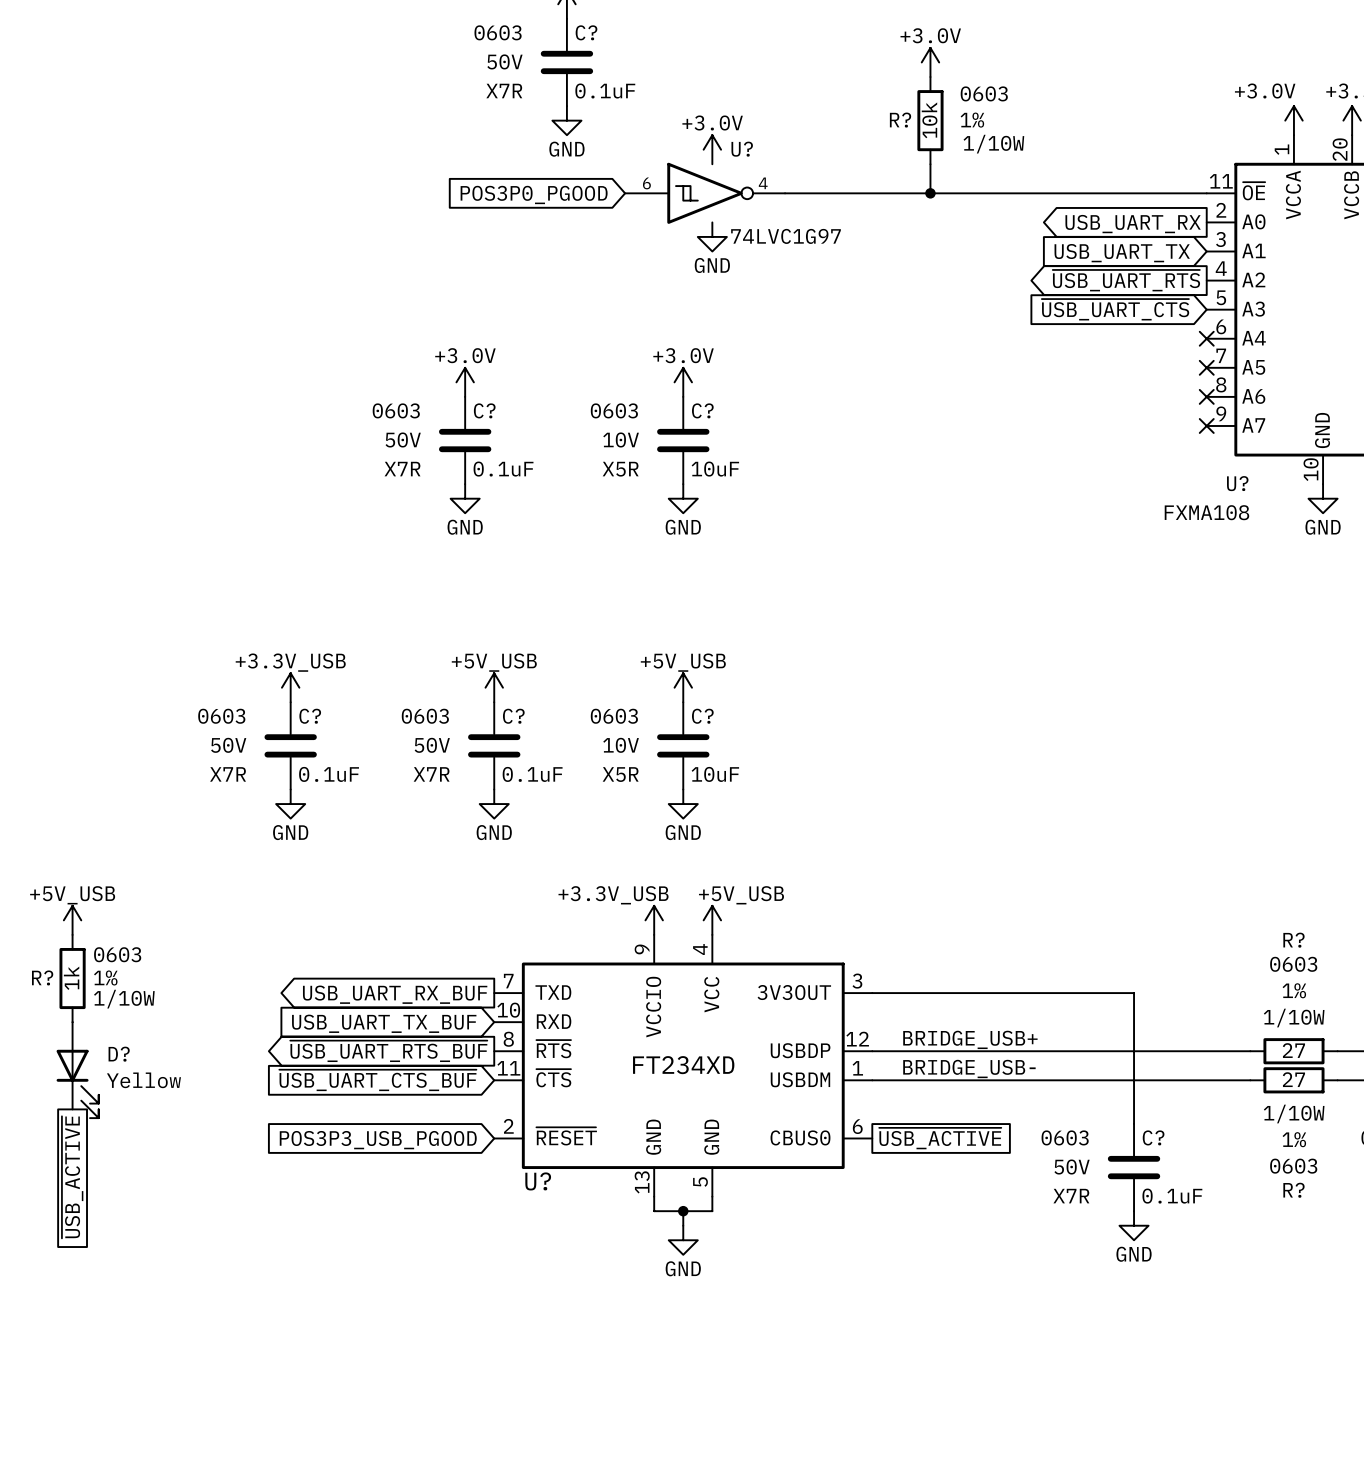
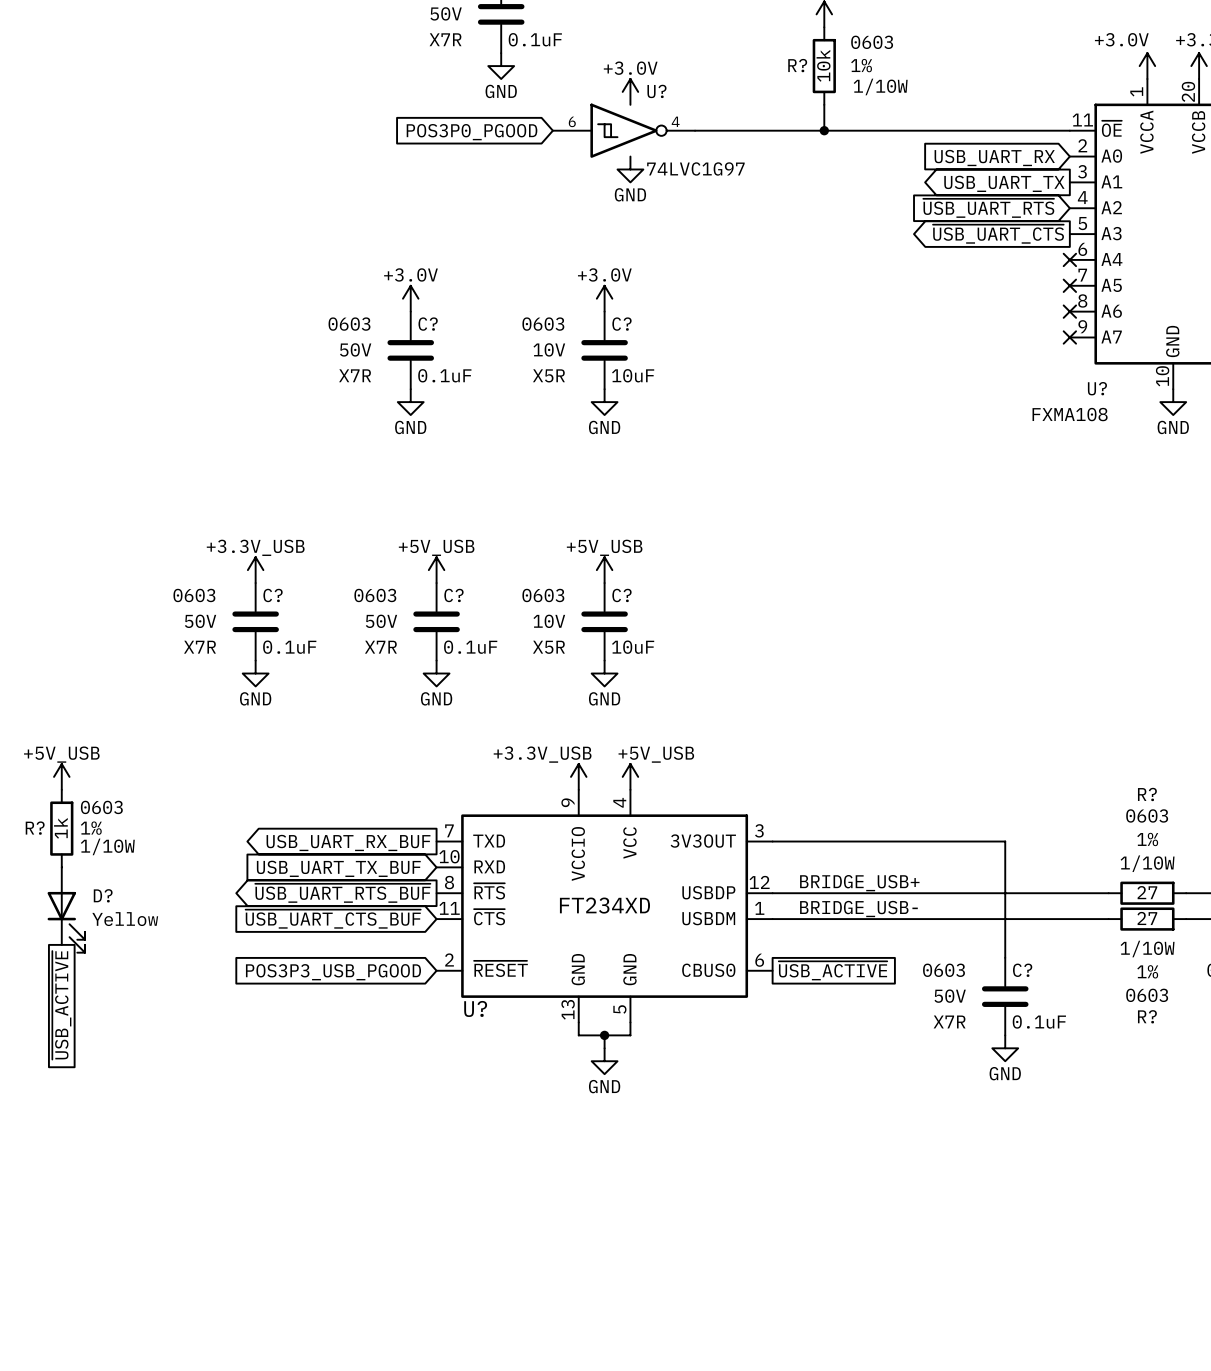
global label shape: output (1133, 224) -> input (994, 158)
global label shape: input (1122, 253) -> output (1004, 183)
global label shape: output (1126, 280) -> input (988, 208)
global label shape: input (1115, 309) -> output (998, 234)

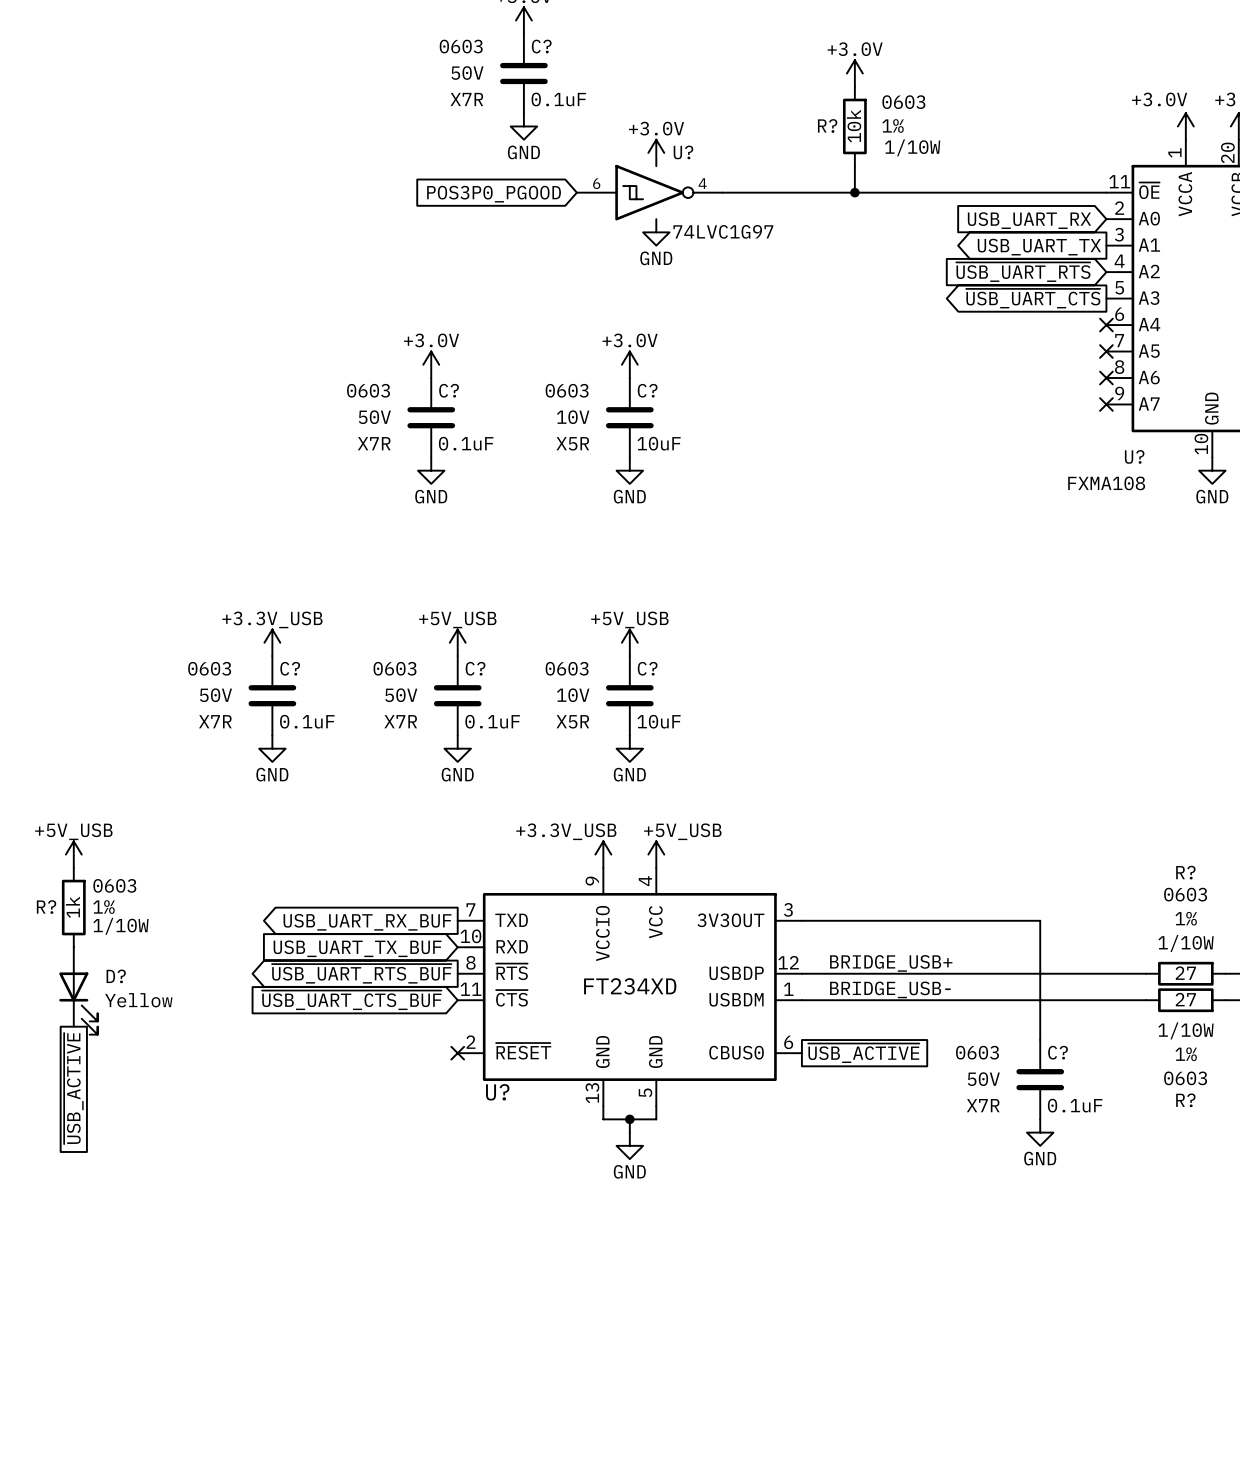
no-connect mark: none -> (457, 1053)
global label: POS3P3_USB_PGOOD (333, 972) -> none

